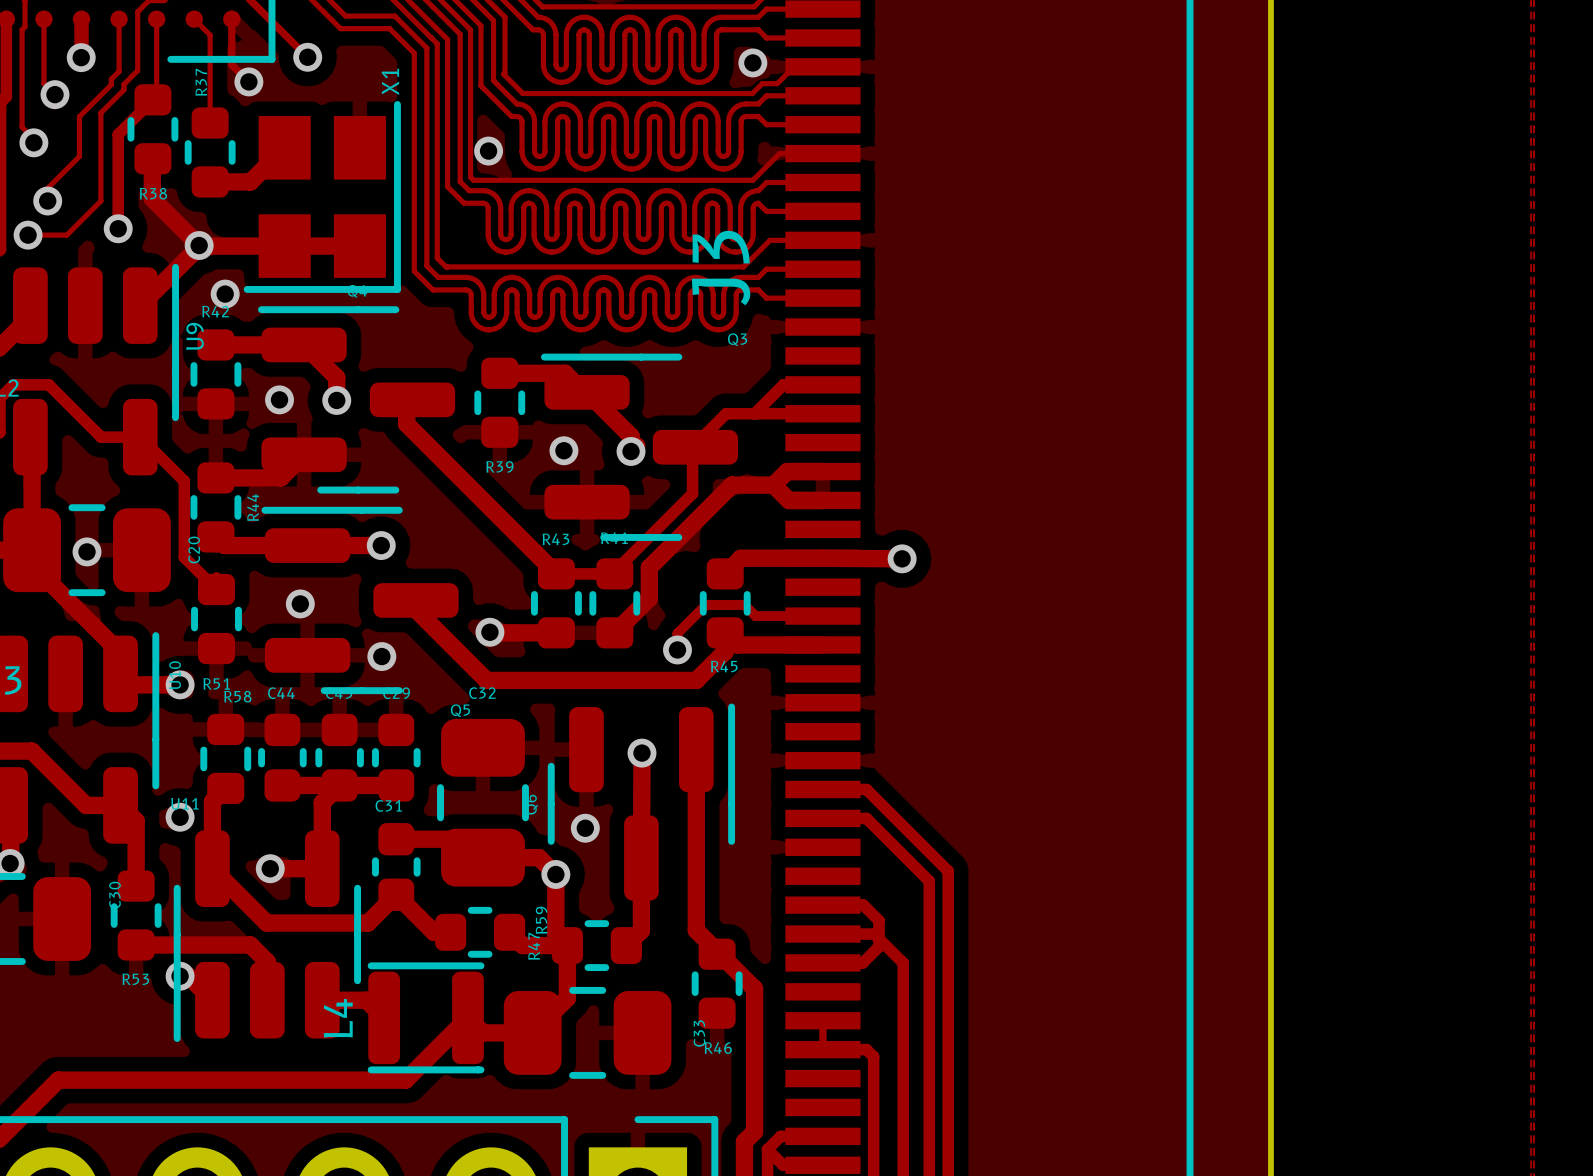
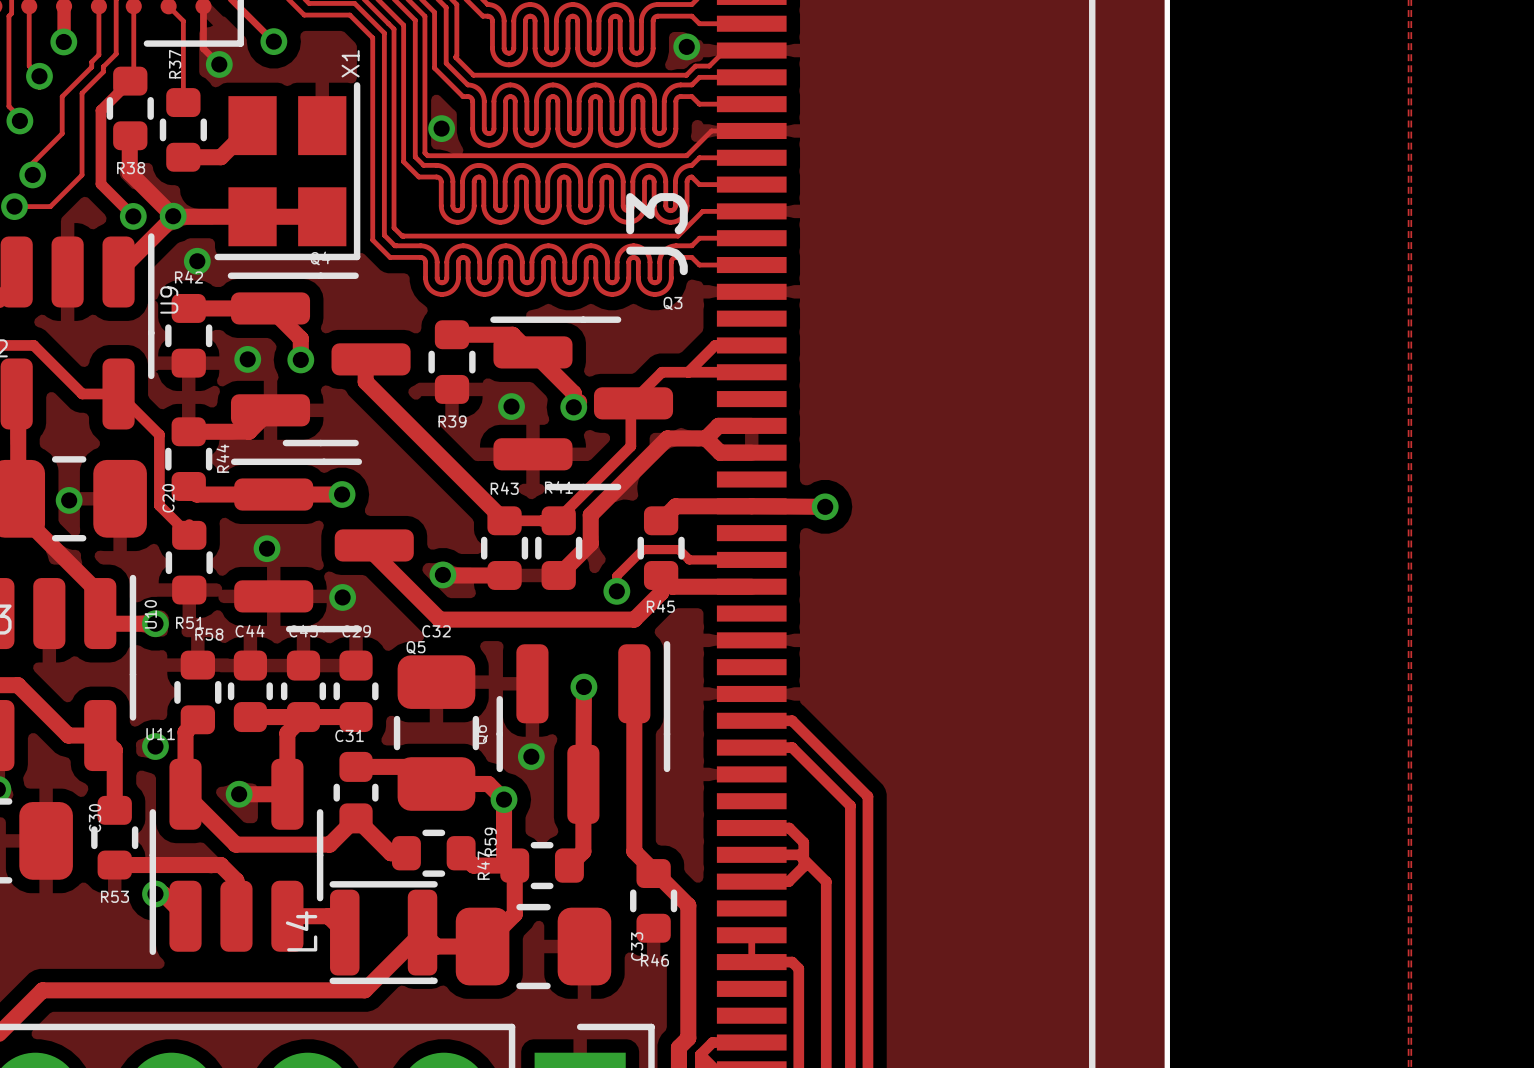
track: (121, 131) (118, 134) (118, 228) -> (100, 110) (100, 184) (133, 216)
via position: (118, 228) -> (133, 216)

